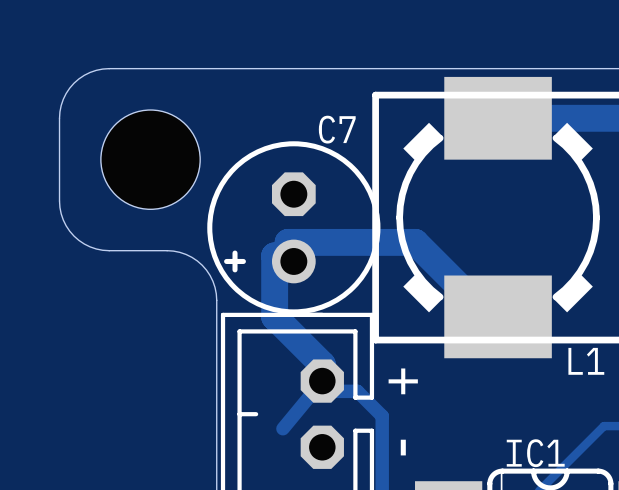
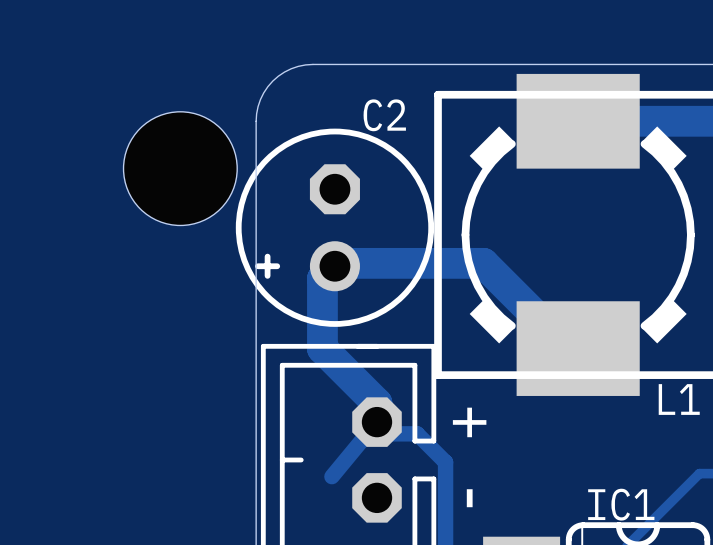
board edge: (266, 68) (102, 69) (90, 72) (74, 83) (66, 93) (61, 105) (59, 118) (59, 207) (63, 220) (69, 231) (84, 244) (96, 248) (167, 250) (186, 254) (202, 265) (210, 275) (215, 287) (216, 300) -> (312, 64) (298, 66) (278, 76) (263, 92) (258, 106) (256, 121) (256, 329)
C7 name: C7 (337, 129) -> C2 (384, 115)
C7 position: (293, 227) -> (334, 227)

